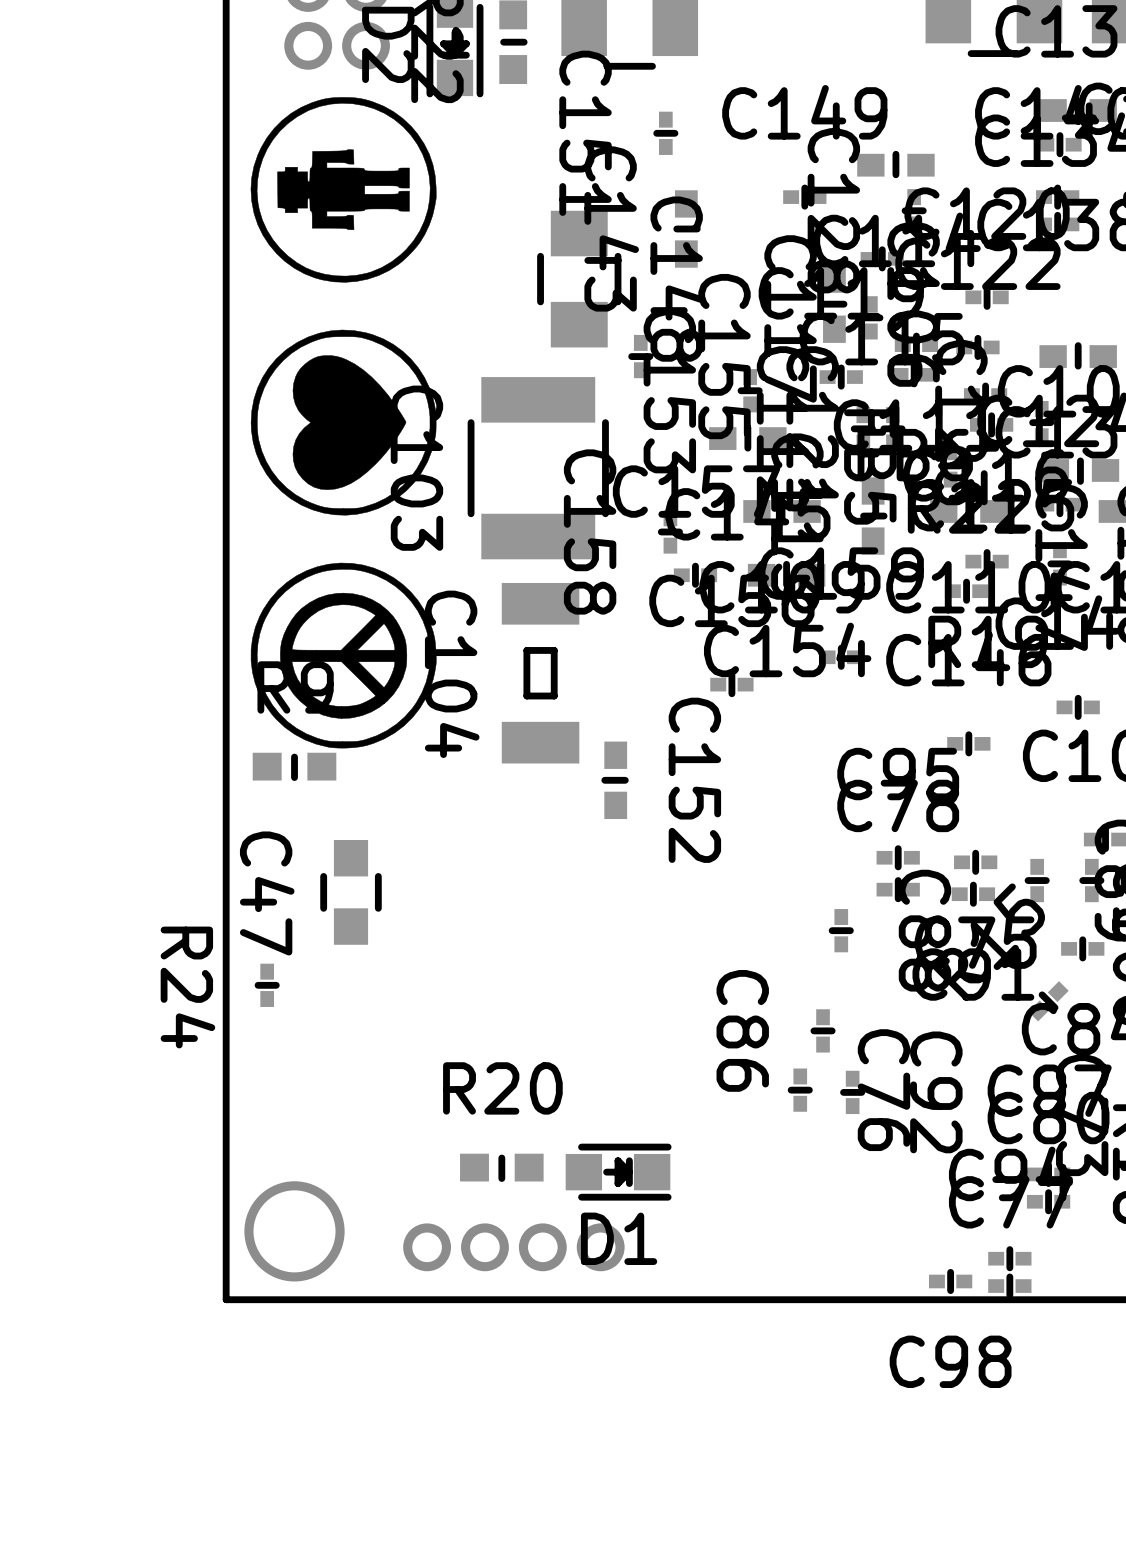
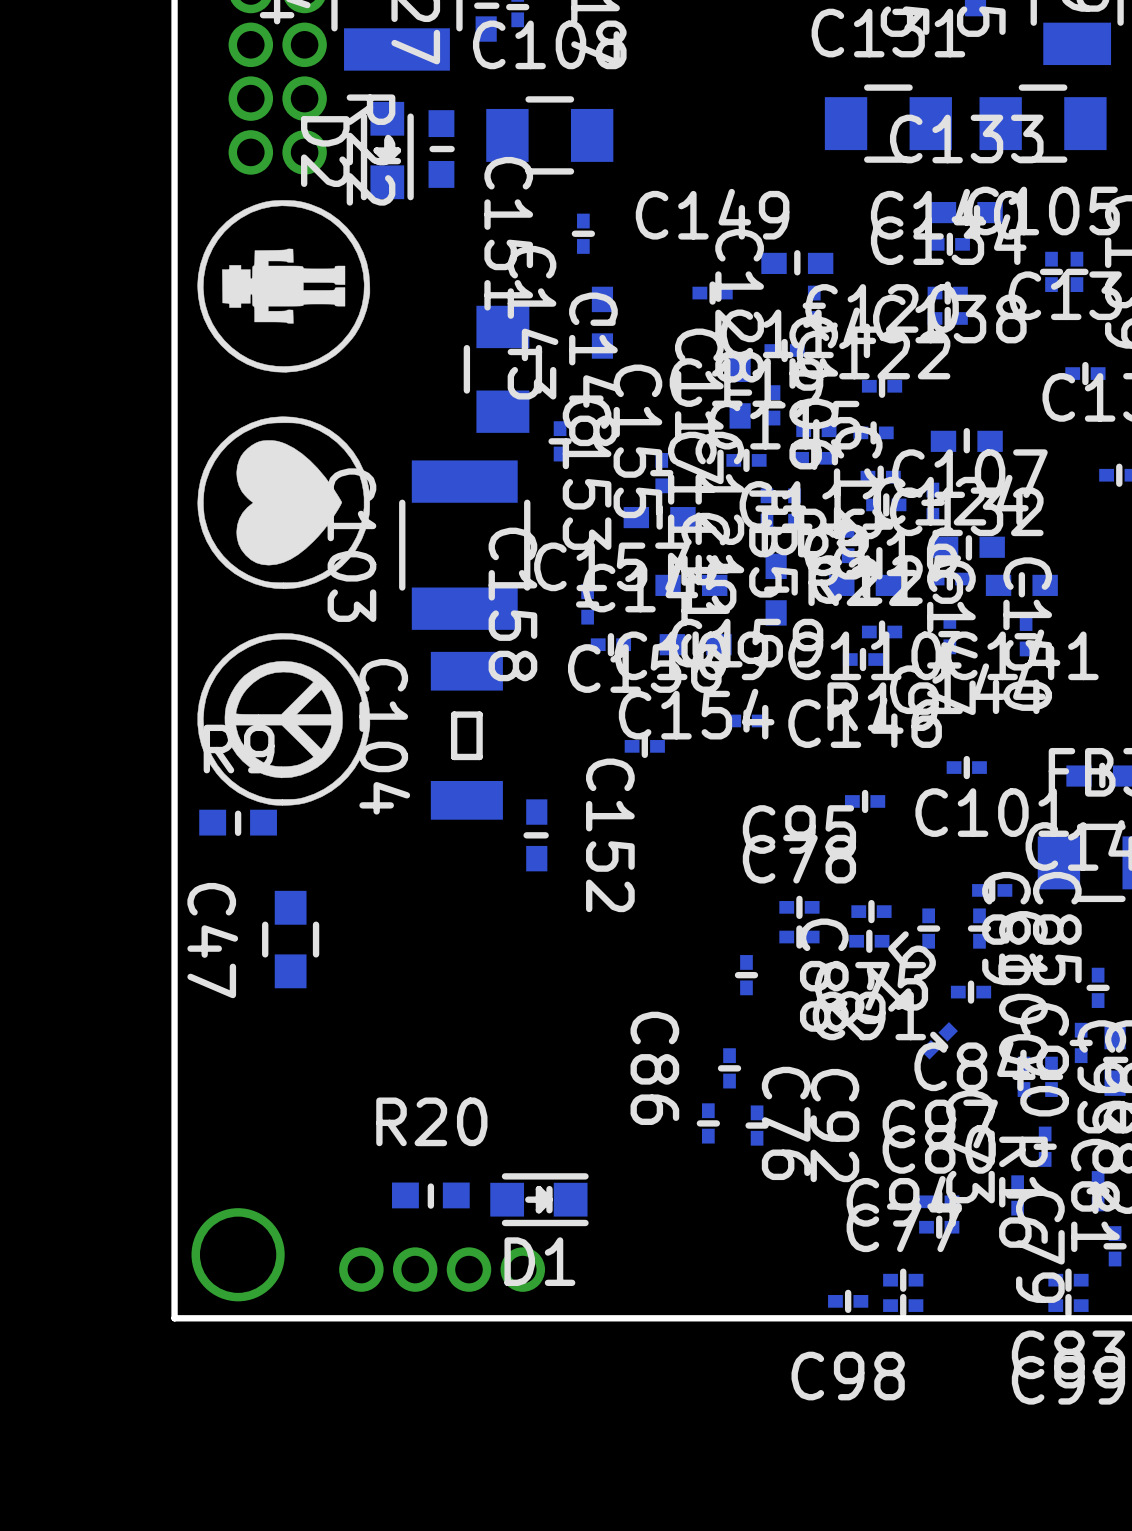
R24: (267, 985) -> none

